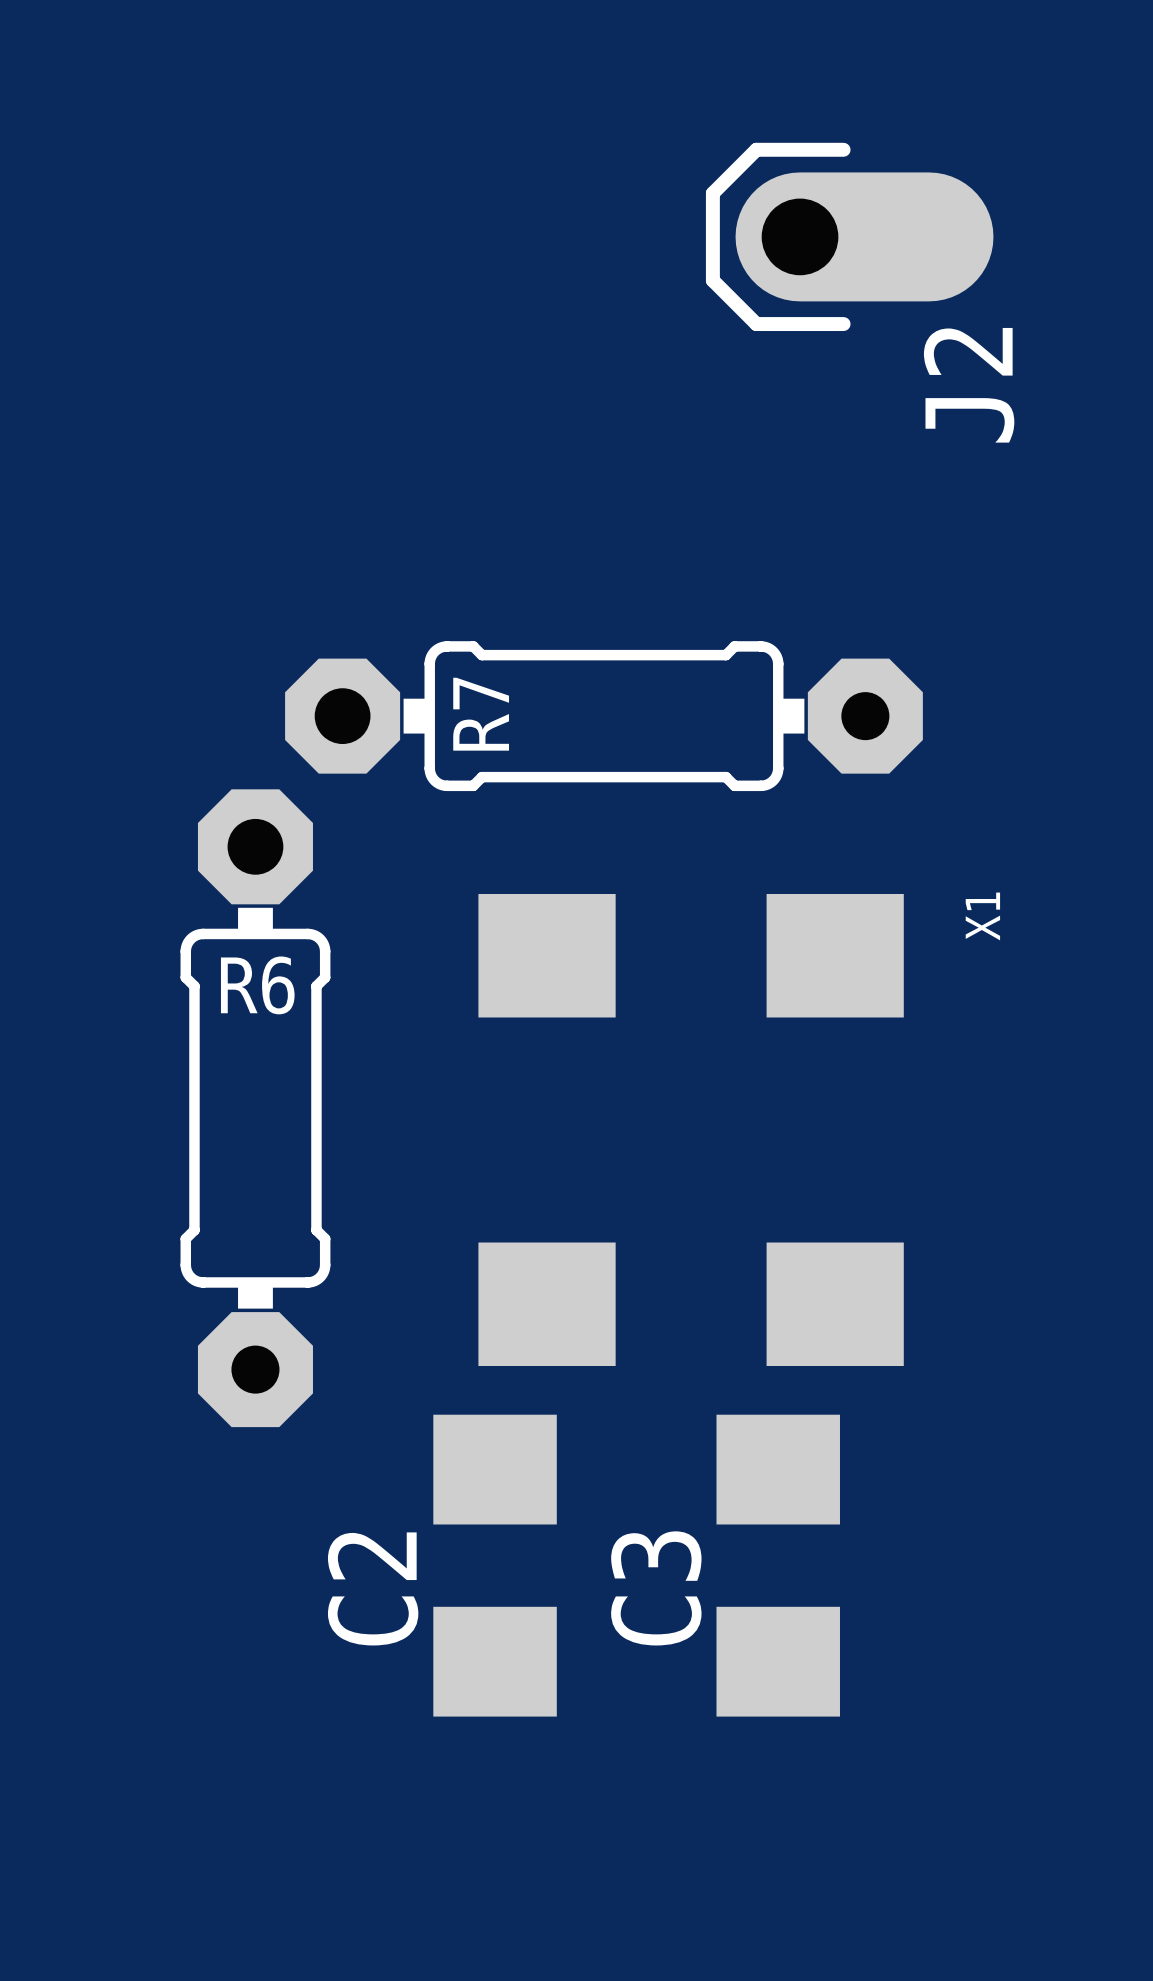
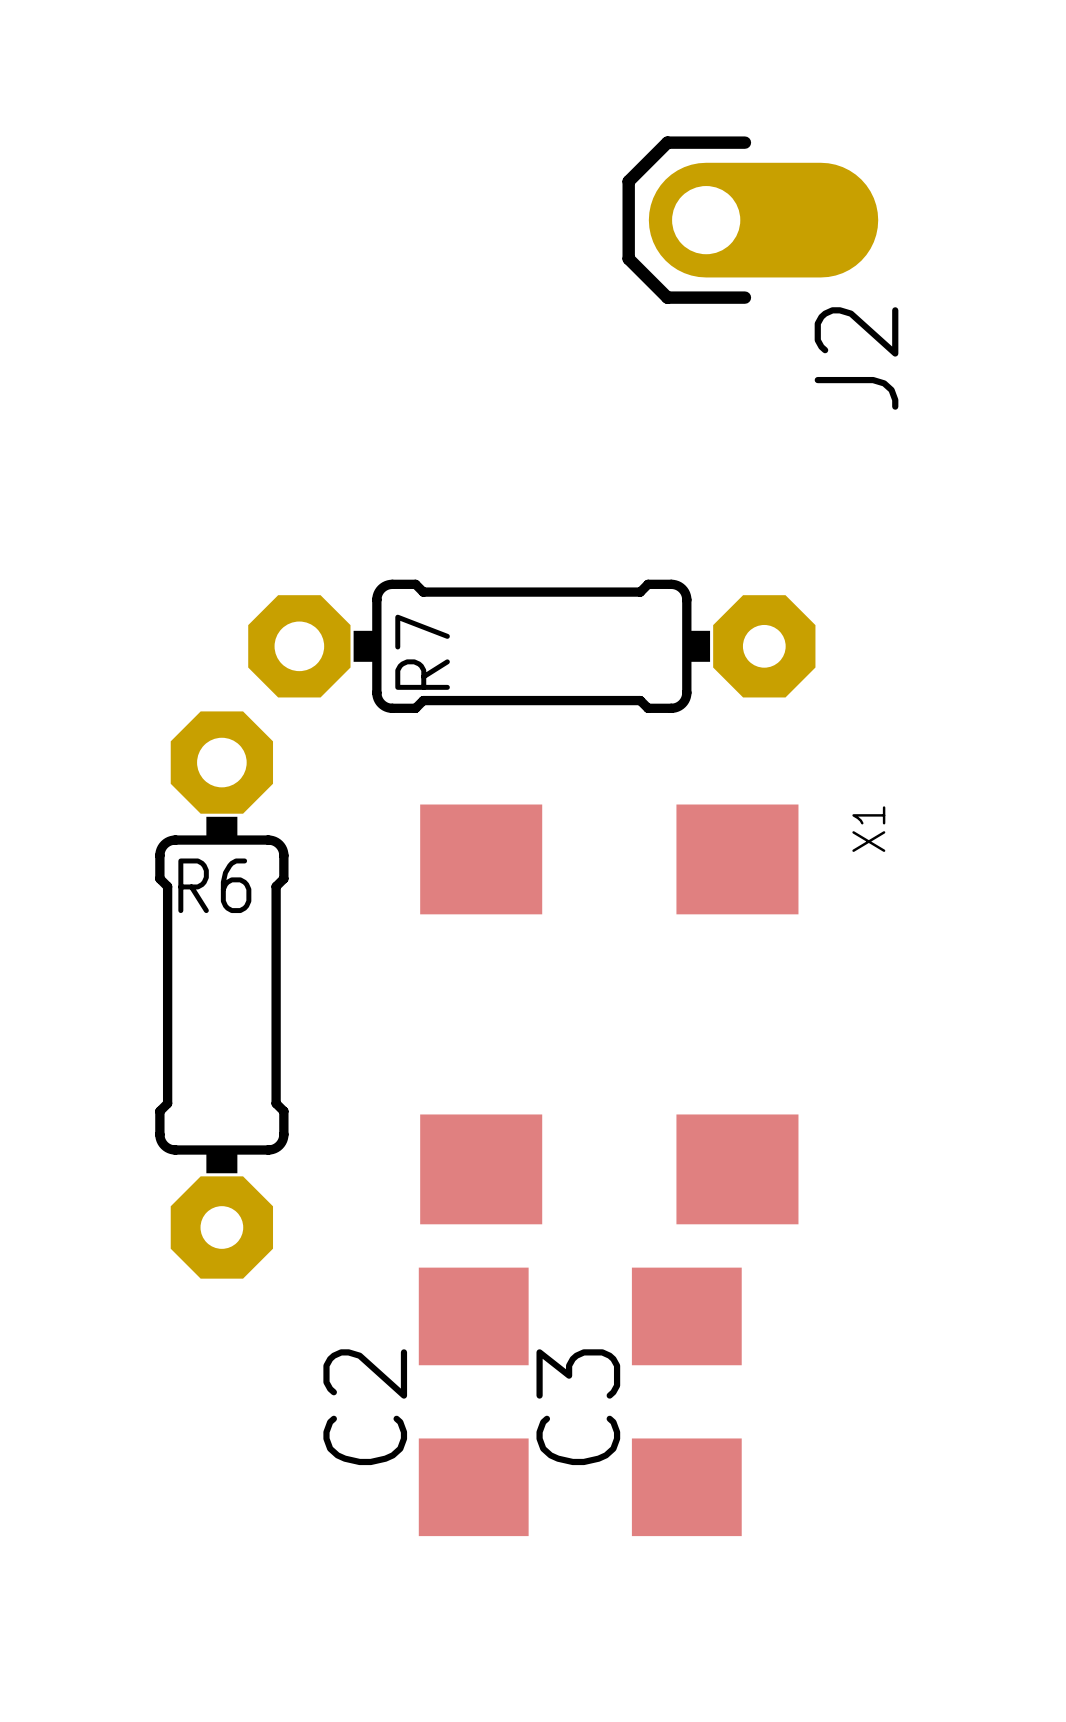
C2 position: (495, 1565) -> (473, 1401)

